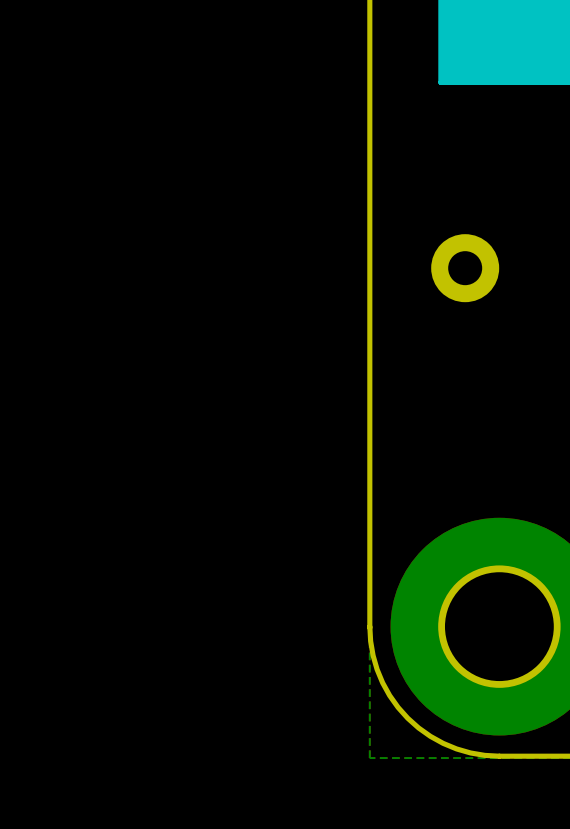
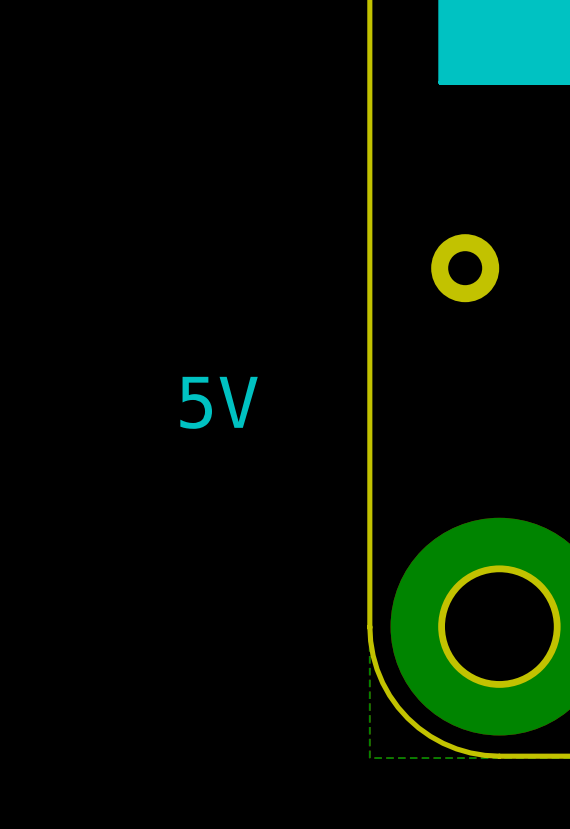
text: none -> 5V (219, 402)

